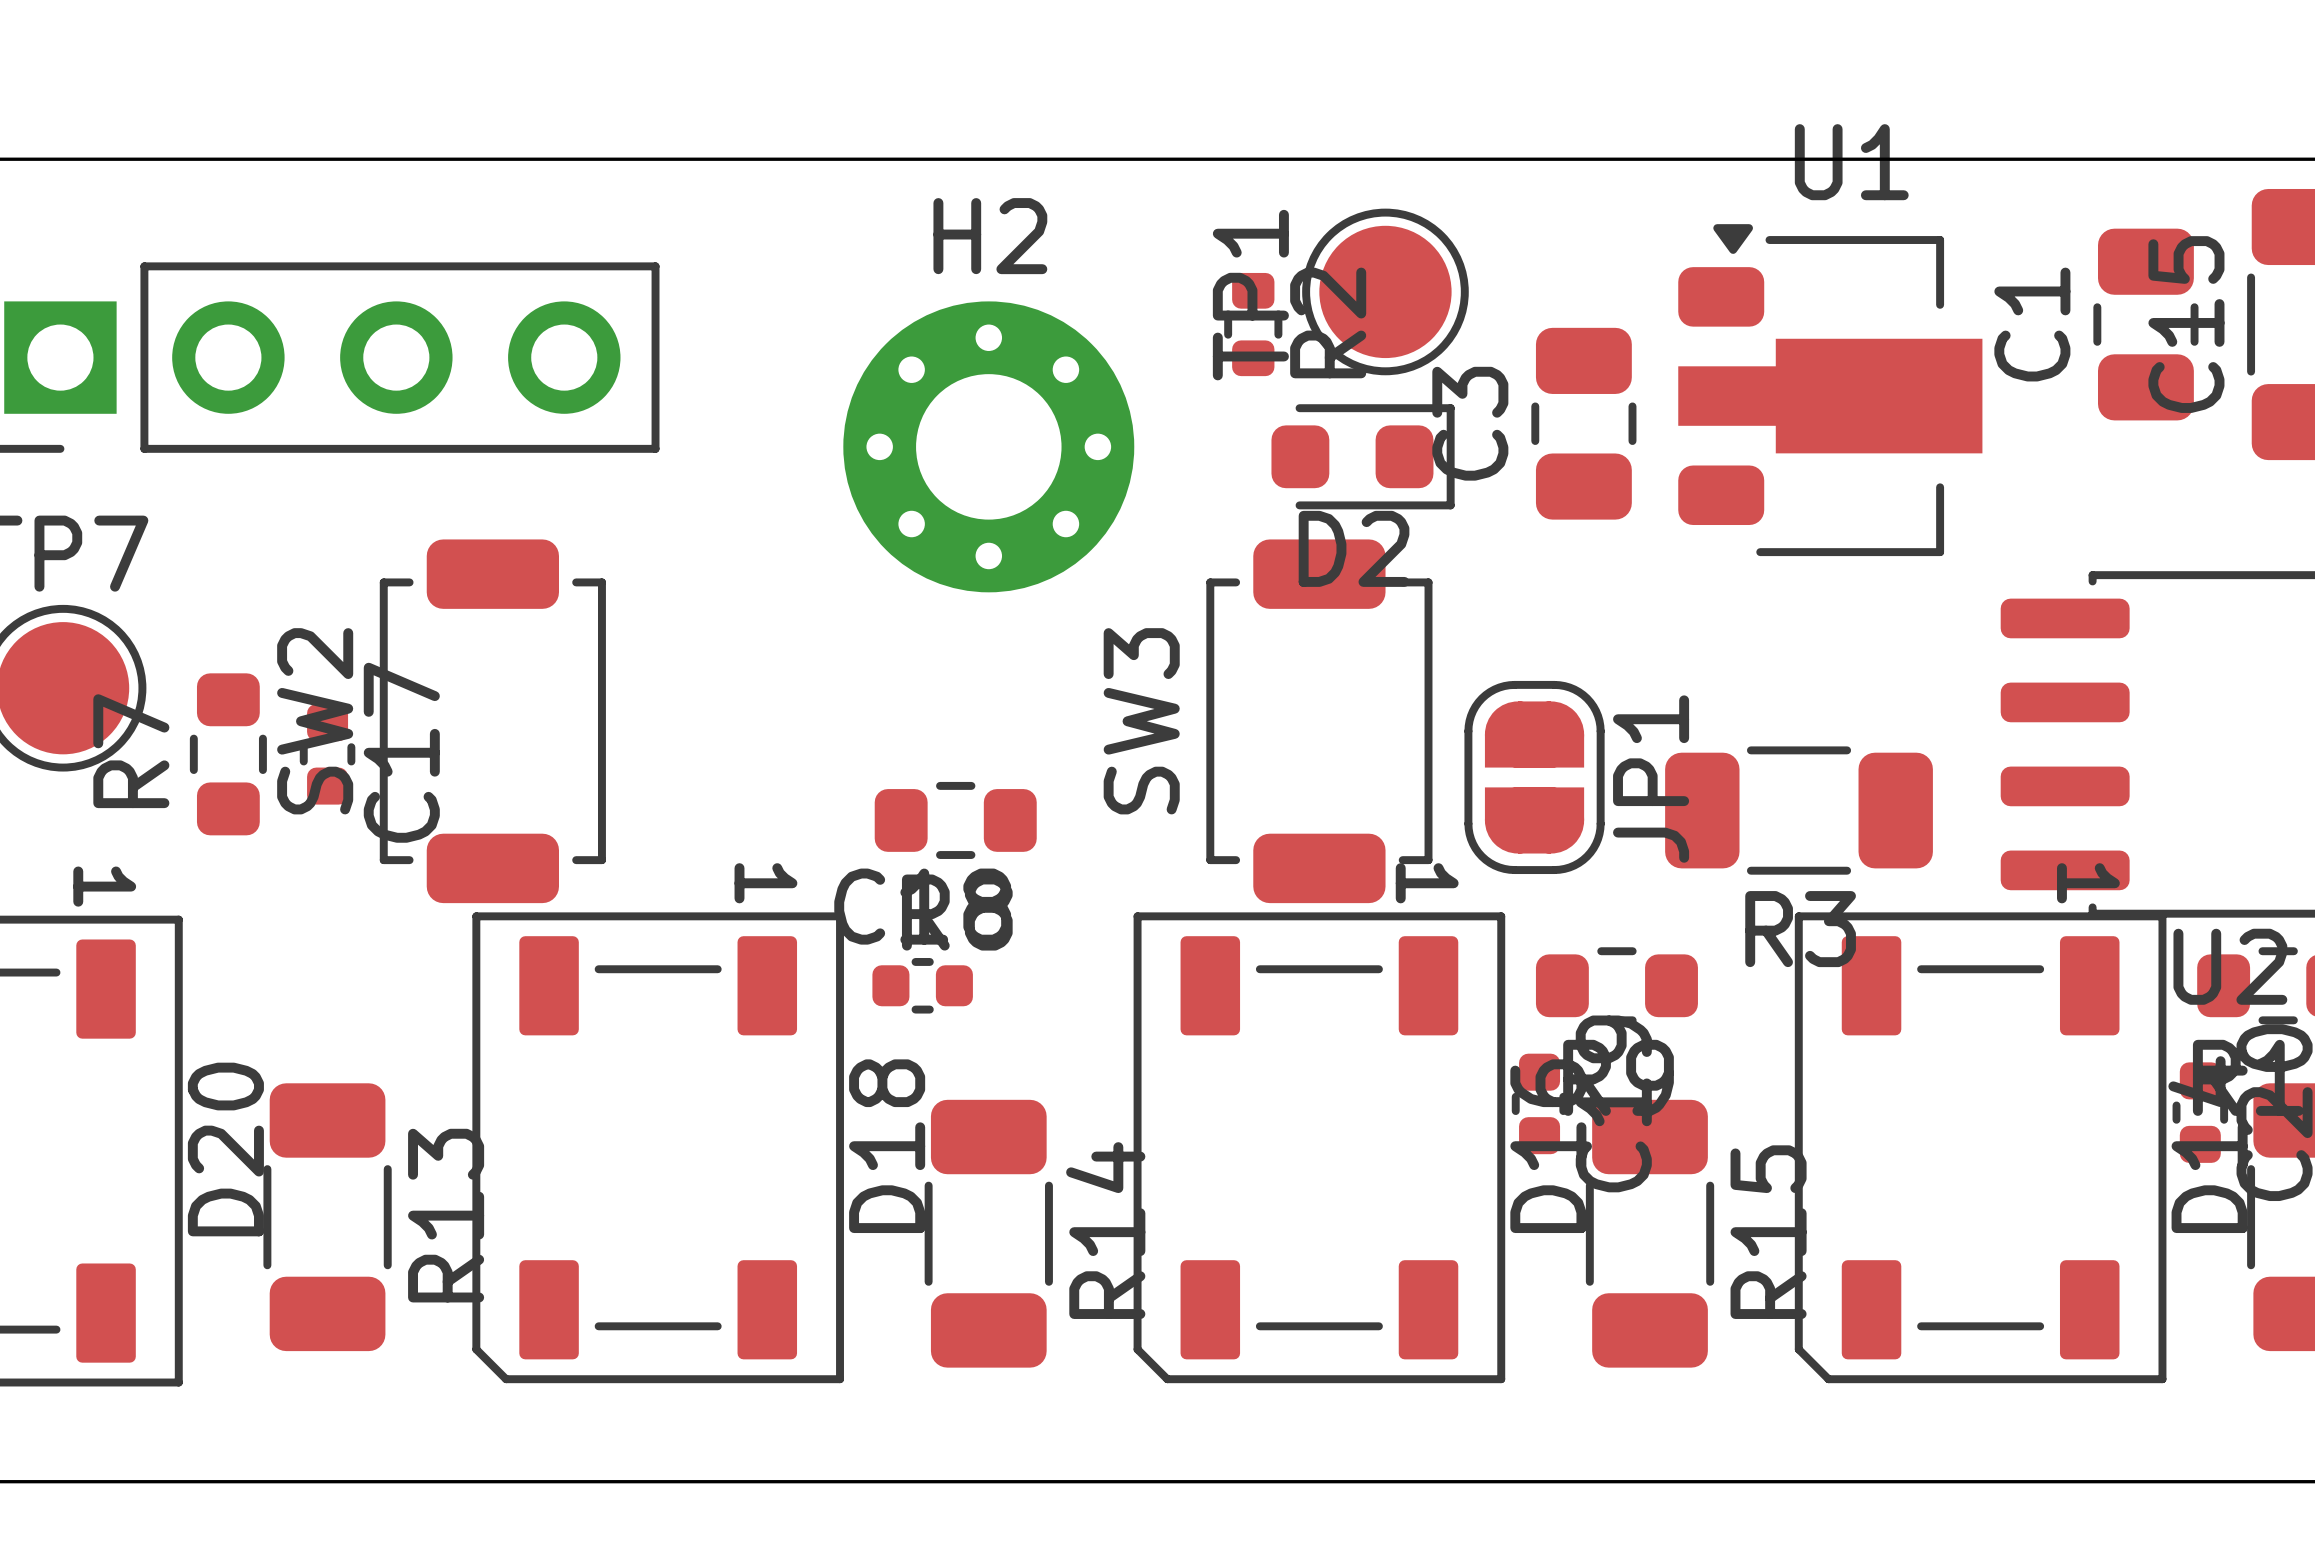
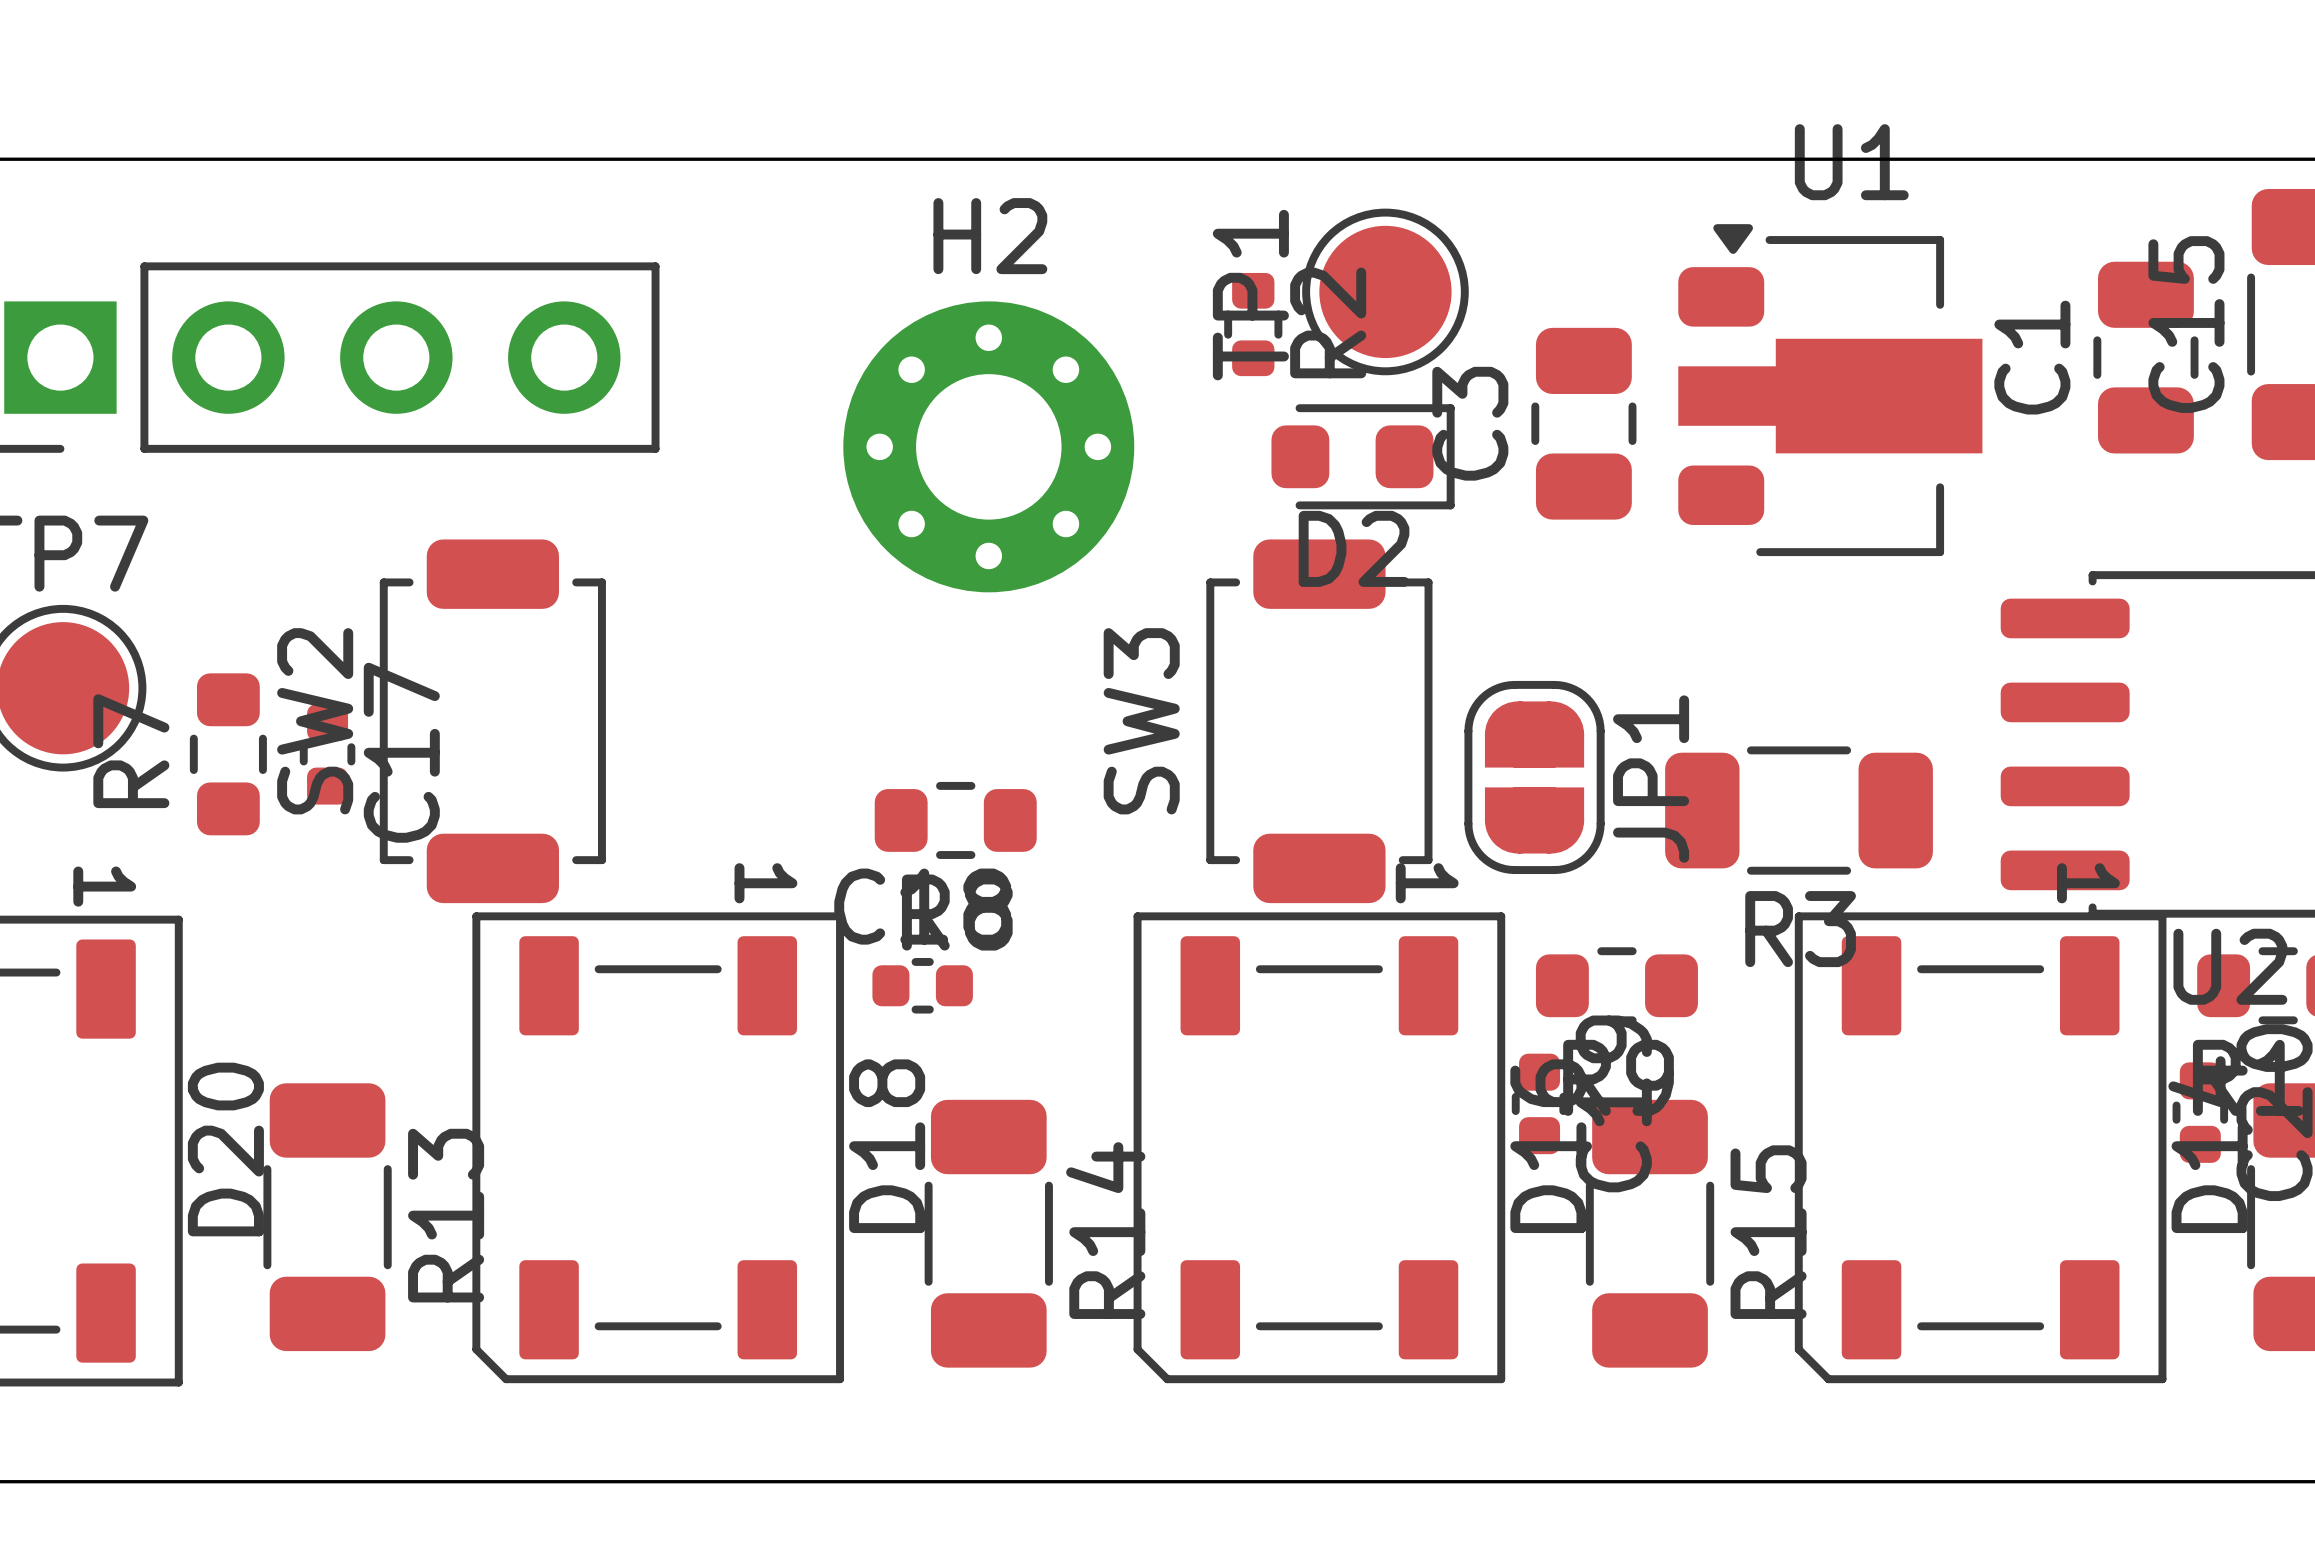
C1 position: (2145, 324) -> (2145, 357)

